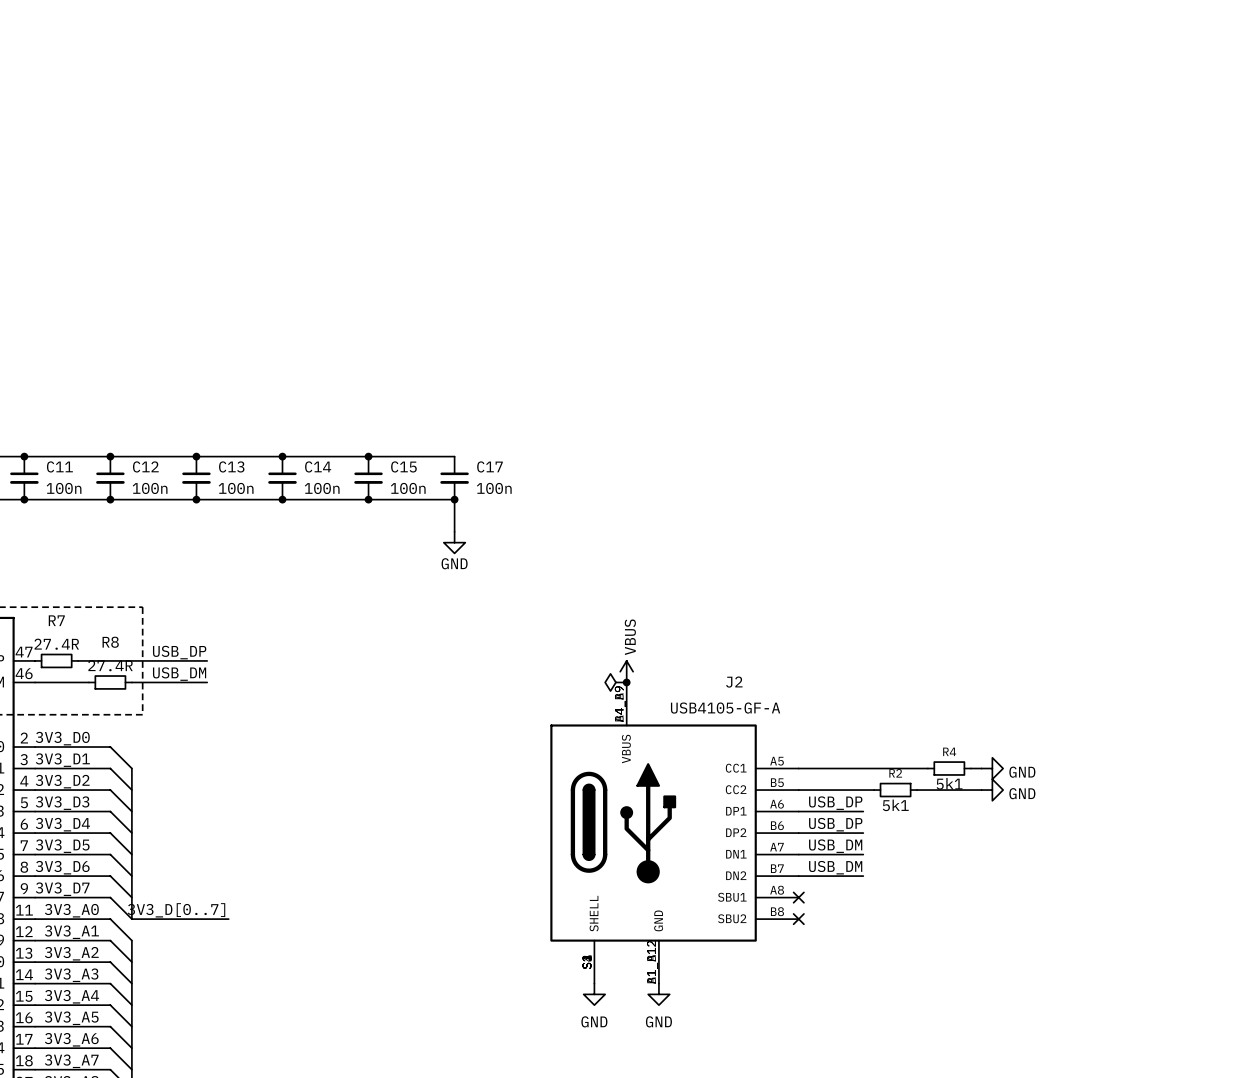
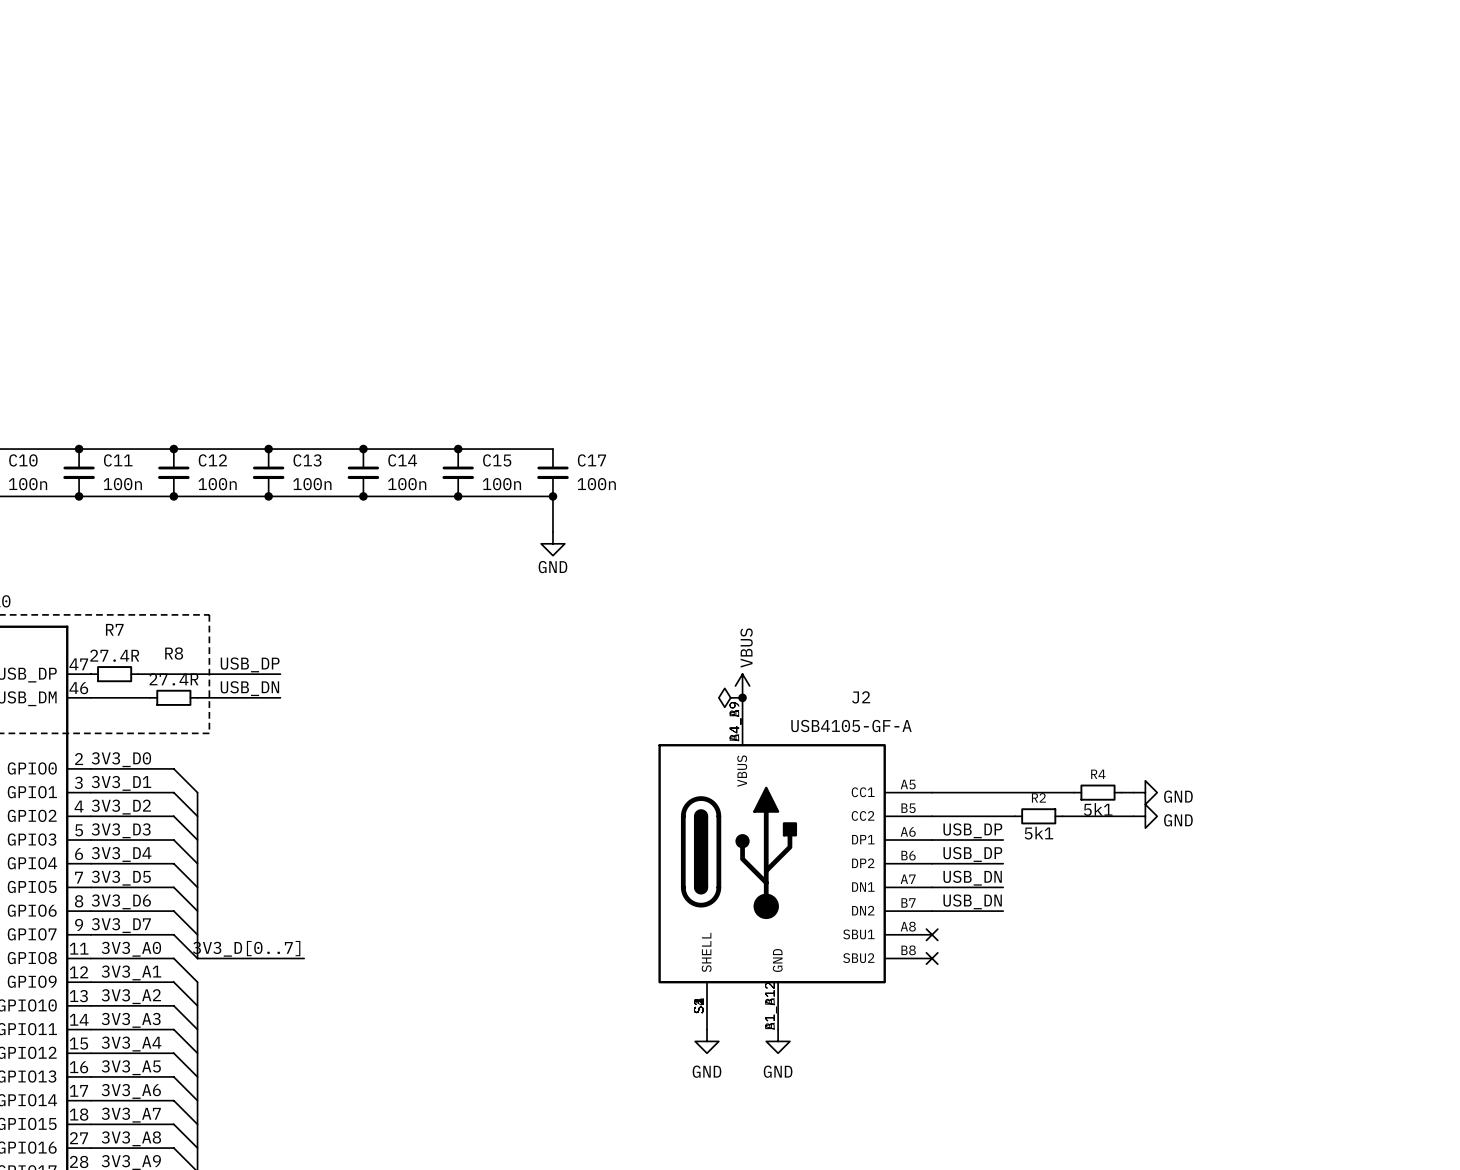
label: USB_DM (179, 674) -> USB_DN (249, 688)
label: USB_DM (835, 846) -> USB_DN (972, 878)
label: USB_DM (835, 867) -> USB_DN (972, 901)

